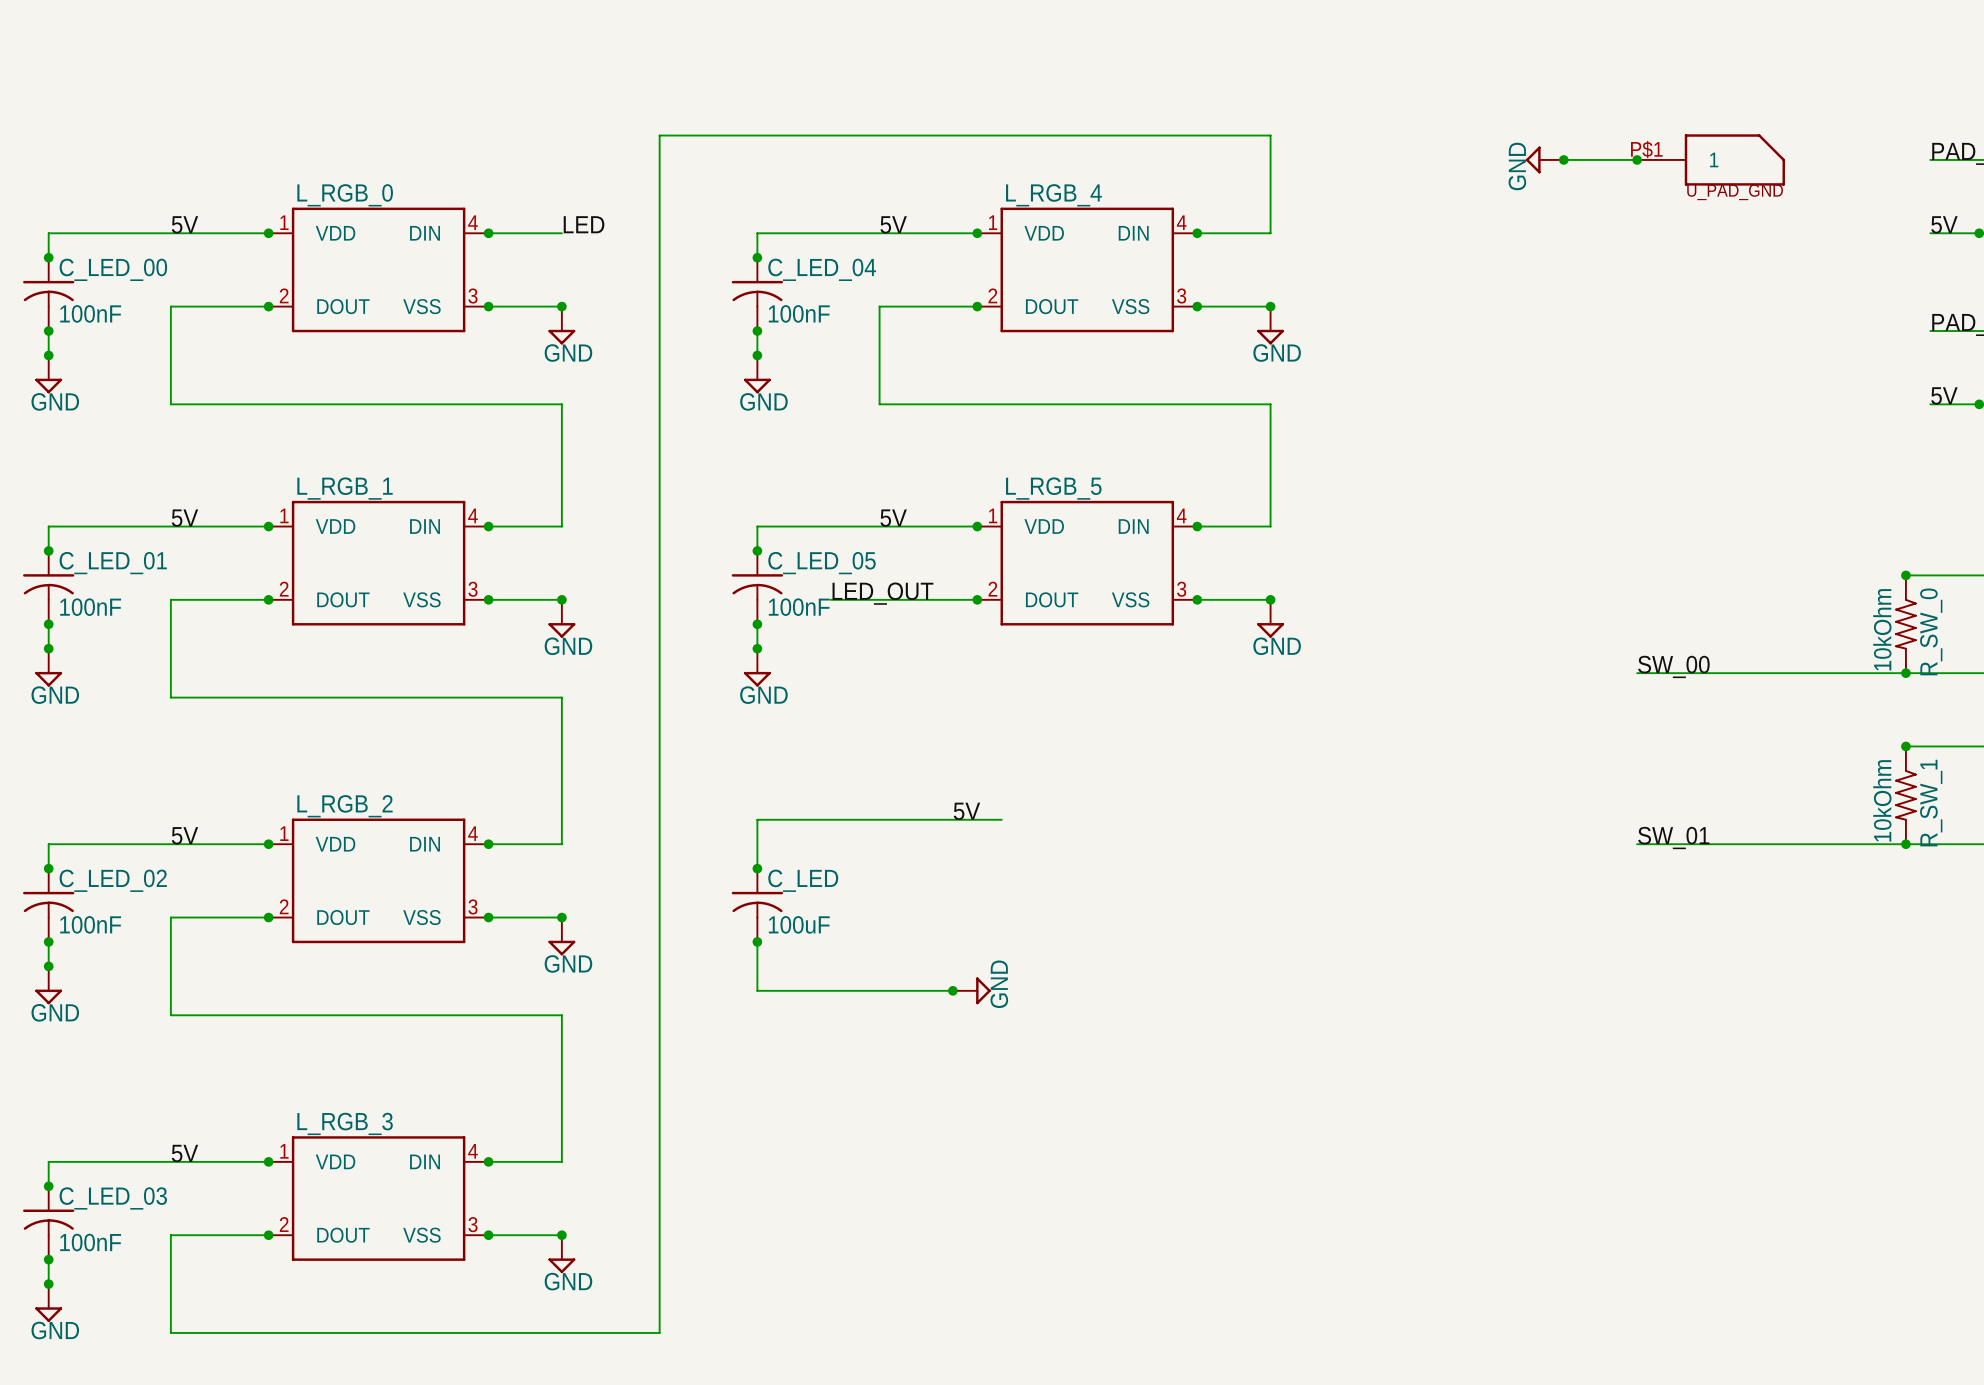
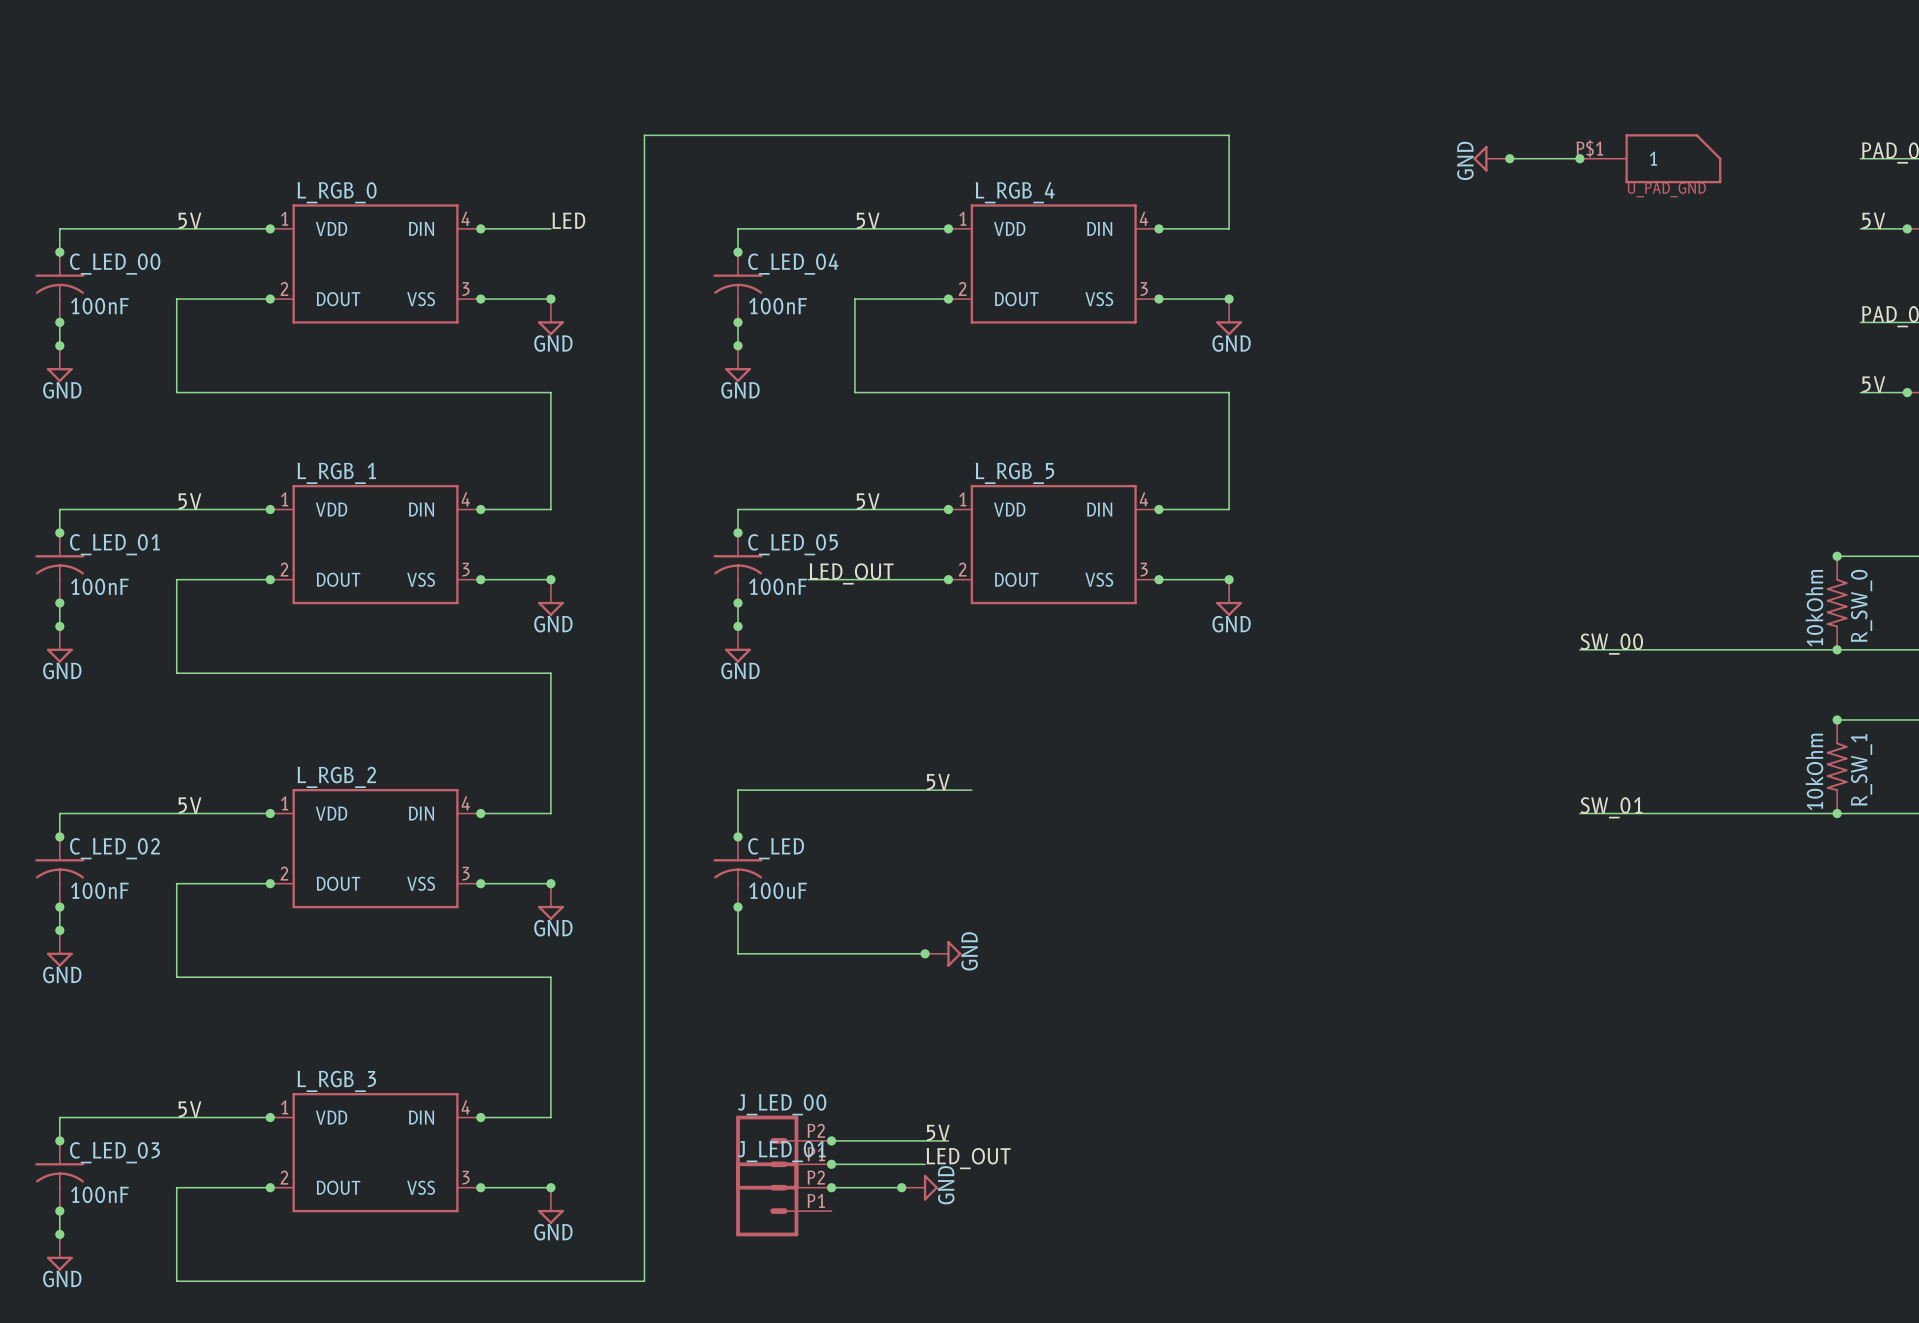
label: none -> 5V (938, 1132)
wire: none -> (831, 1140) (948, 1140)
junction: none -> (831, 1140)
J_LED_00: none -> (783, 1152)
label: none -> LED_OUT (968, 1158)
wire: none -> (831, 1164) (925, 1164)
junction: none -> (831, 1164)
wire: none -> (831, 1187) (901, 1187)
junction: none -> (831, 1187)
junction: none -> (901, 1187)
power symbol: none -> GND (919, 1187)
J_LED_01: none -> (783, 1199)

